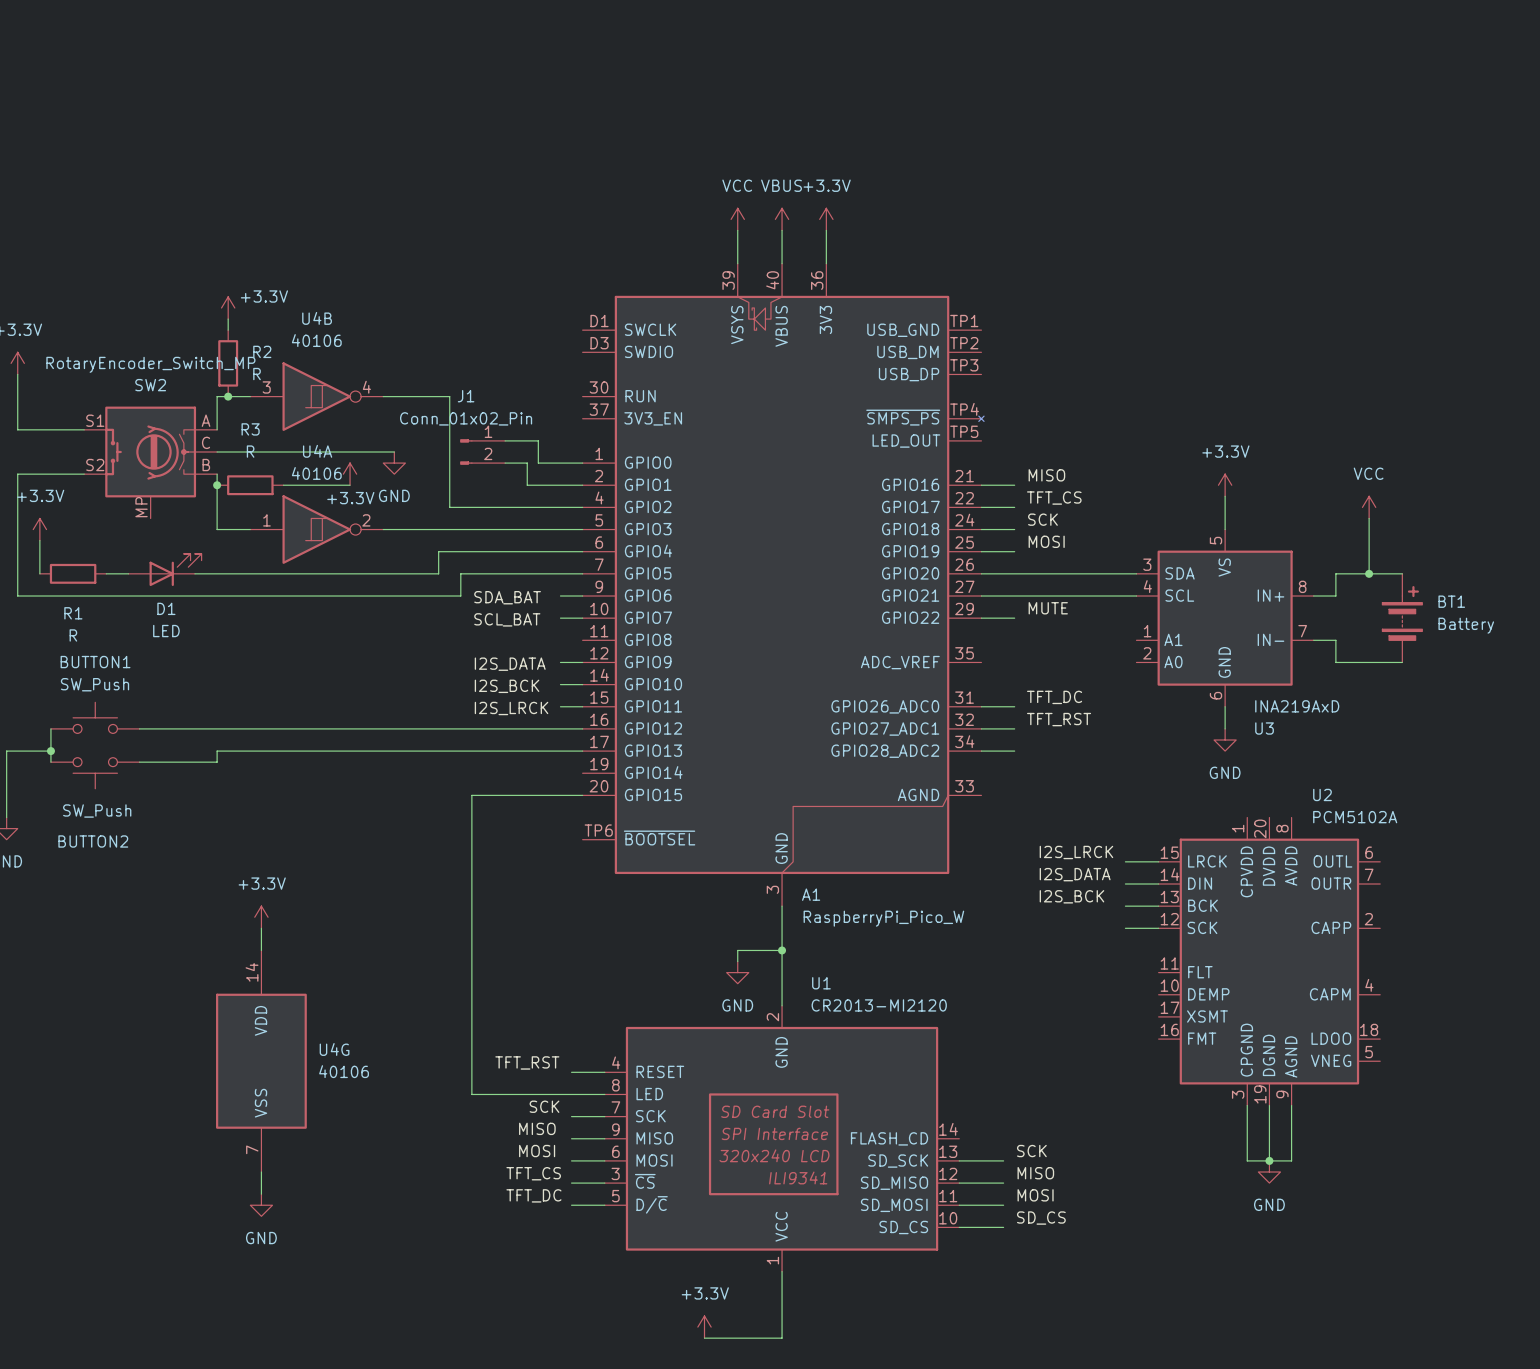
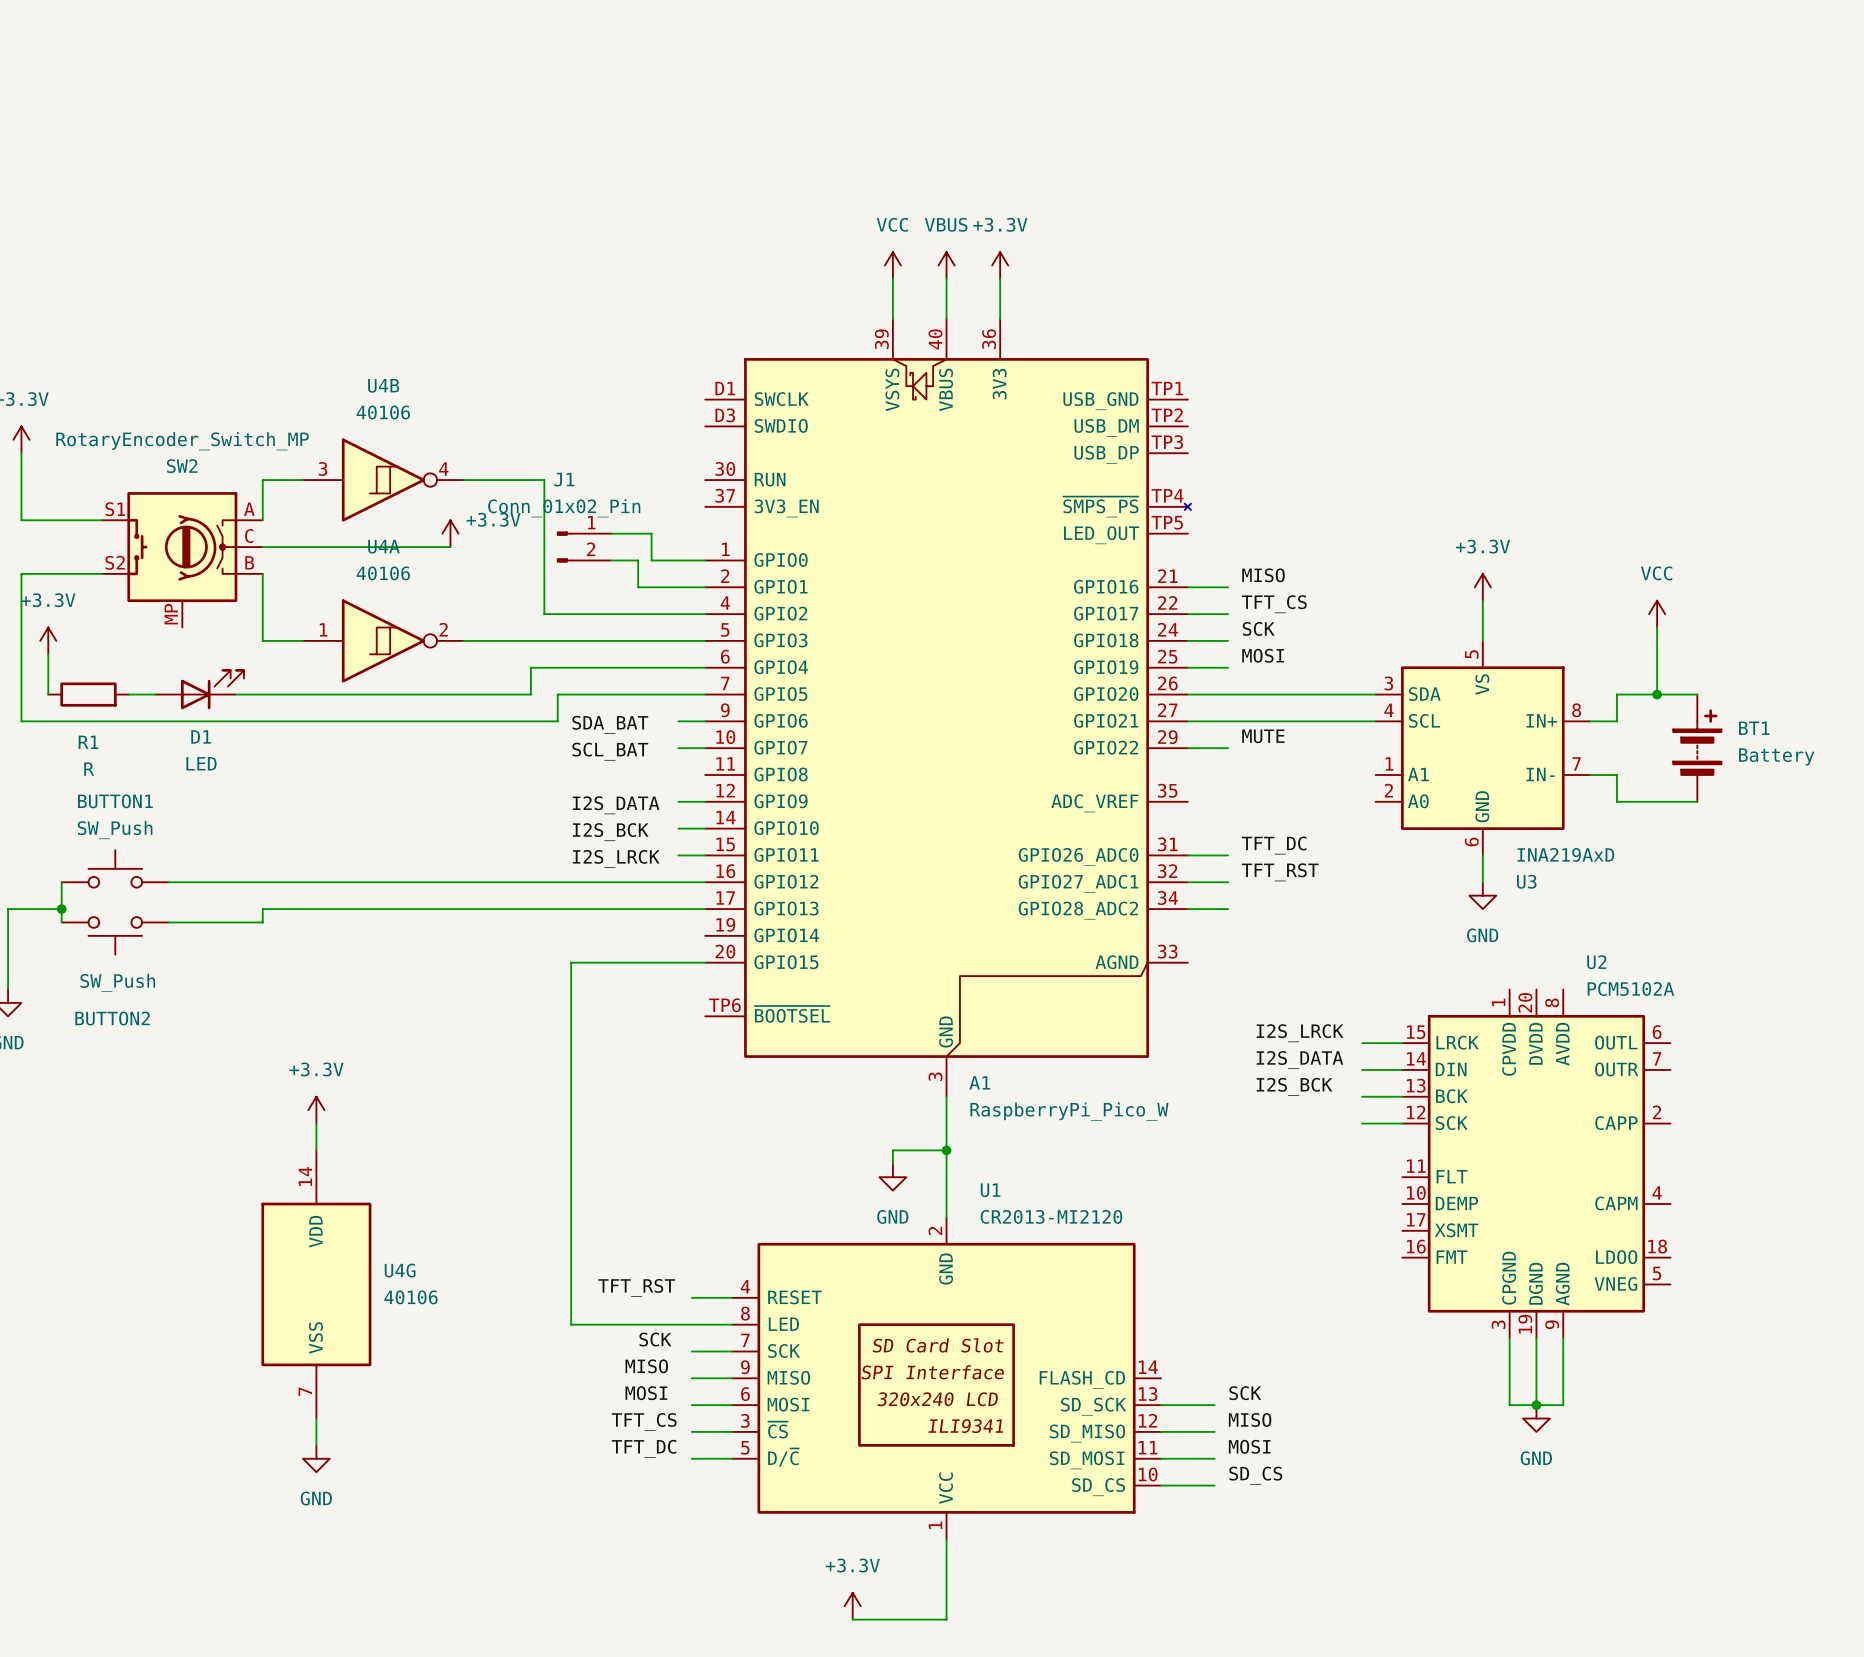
power symbol: +3.3V (228, 307) -> none
wire: (228, 319) (228, 330) -> none
R2: R (228, 363) -> none
junction: (228, 396) -> none
wire: (372, 451) (394, 451) -> none
power symbol: GND (394, 463) -> none
power symbol position: +3.3V (350, 474) -> +3.3V (450, 533)
junction: (217, 485) -> none
R3: R (250, 485) -> none
wire: (283, 485) (350, 485) -> none
power symbol text position: +3.3V (350, 498) -> +3.3V (493, 519)

